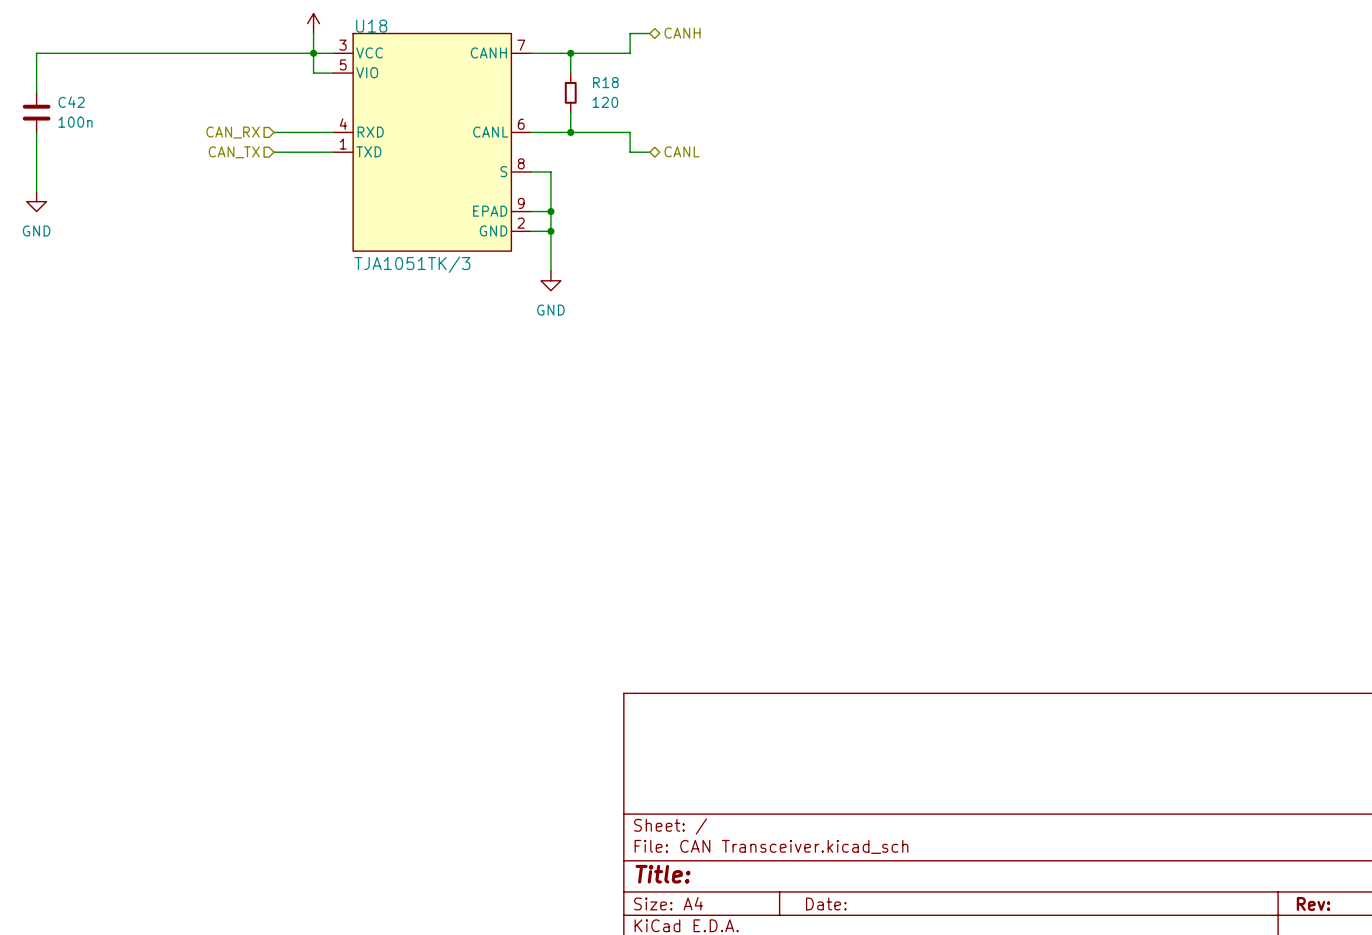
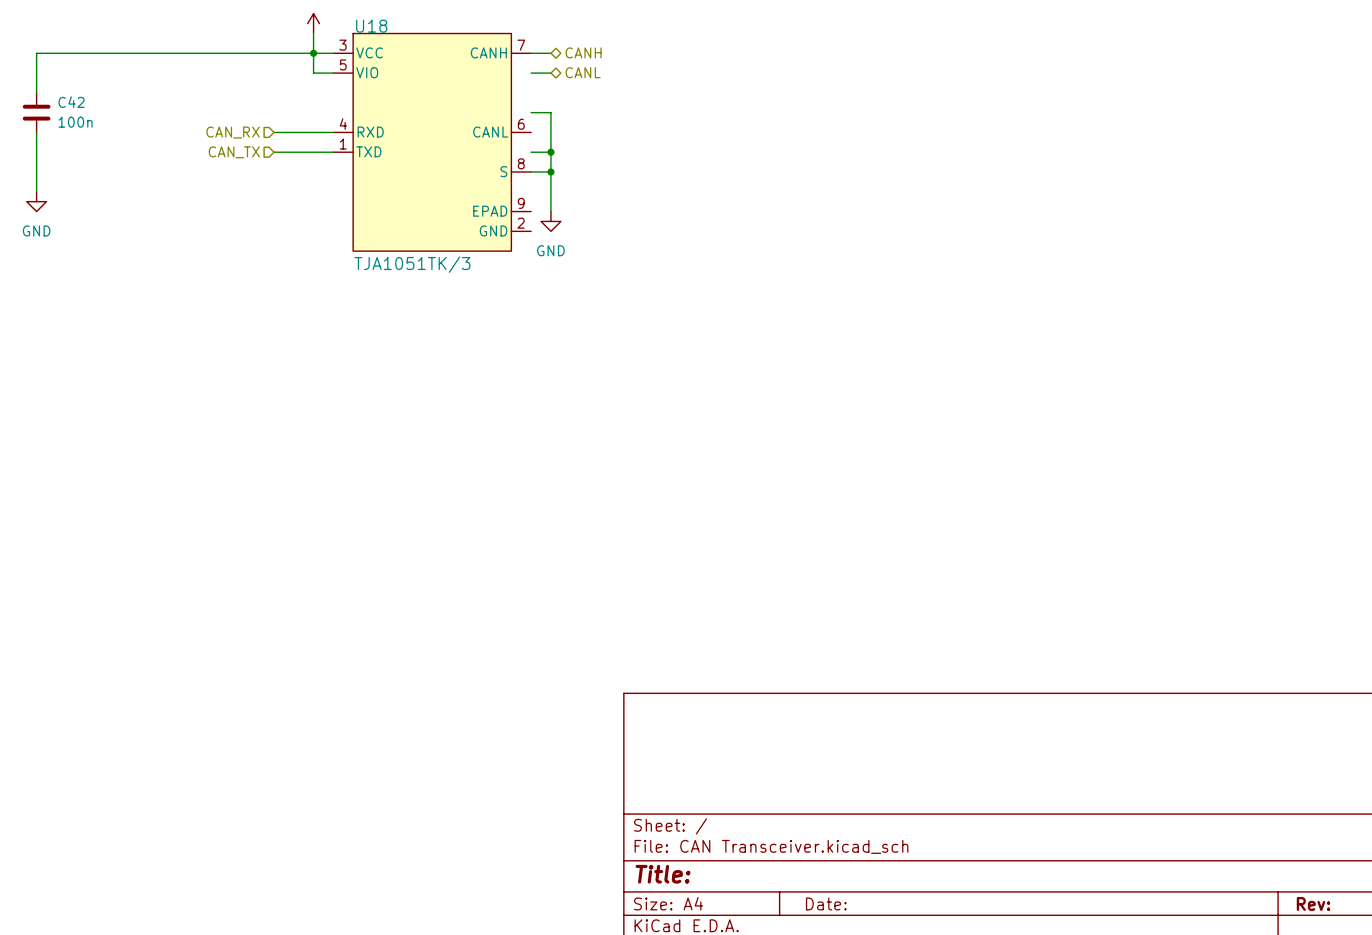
wire: (649, 33) (630, 33) (630, 53) (550, 53) -> none
hierarchical label position: CANH (682, 33) -> CANH (583, 52)
wire: (570, 53) (570, 73) -> none
junction: (570, 53) -> none
wire: none -> (531, 73) (550, 73)
R18: 120 (570, 92) -> none
wire: (570, 112) (570, 132) -> none
wire: (531, 132) (630, 132) (630, 152) (649, 152) -> none
junction: (570, 132) -> none
hierarchical label position: CANL (682, 151) -> CANL (583, 72)
junction: none -> (550, 152)
junction: none -> (550, 171)
wire: (531, 211) (550, 211) (550, 270) -> (531, 112) (550, 112) (550, 171)
junction: (550, 211) -> none
wire: (531, 231) (550, 231) -> (531, 152) (550, 152)
junction: (550, 231) -> none
power symbol position: GND (550, 280) -> GND (550, 221)

